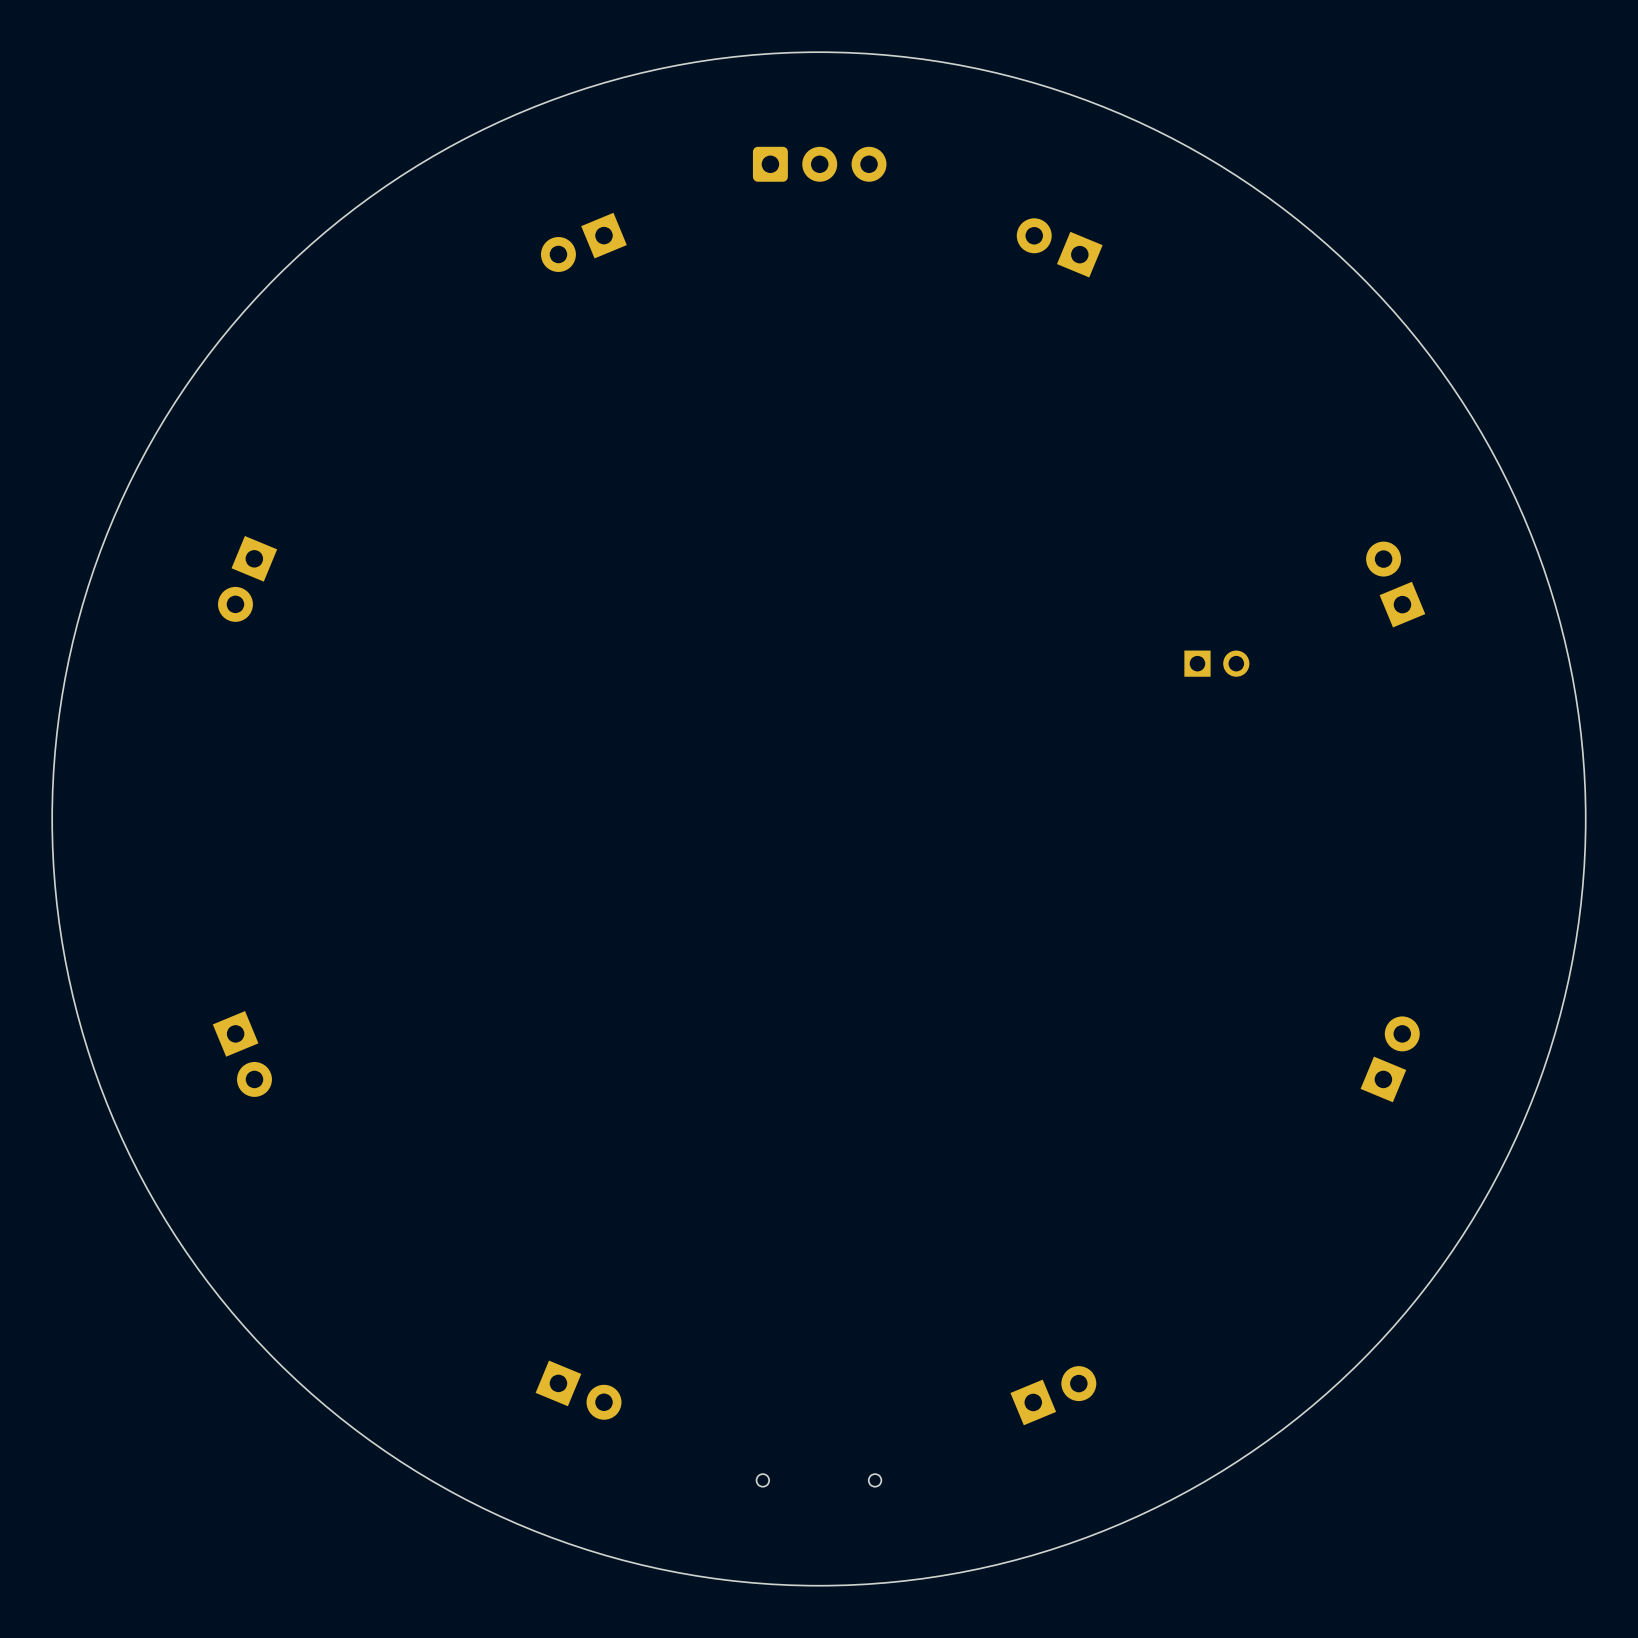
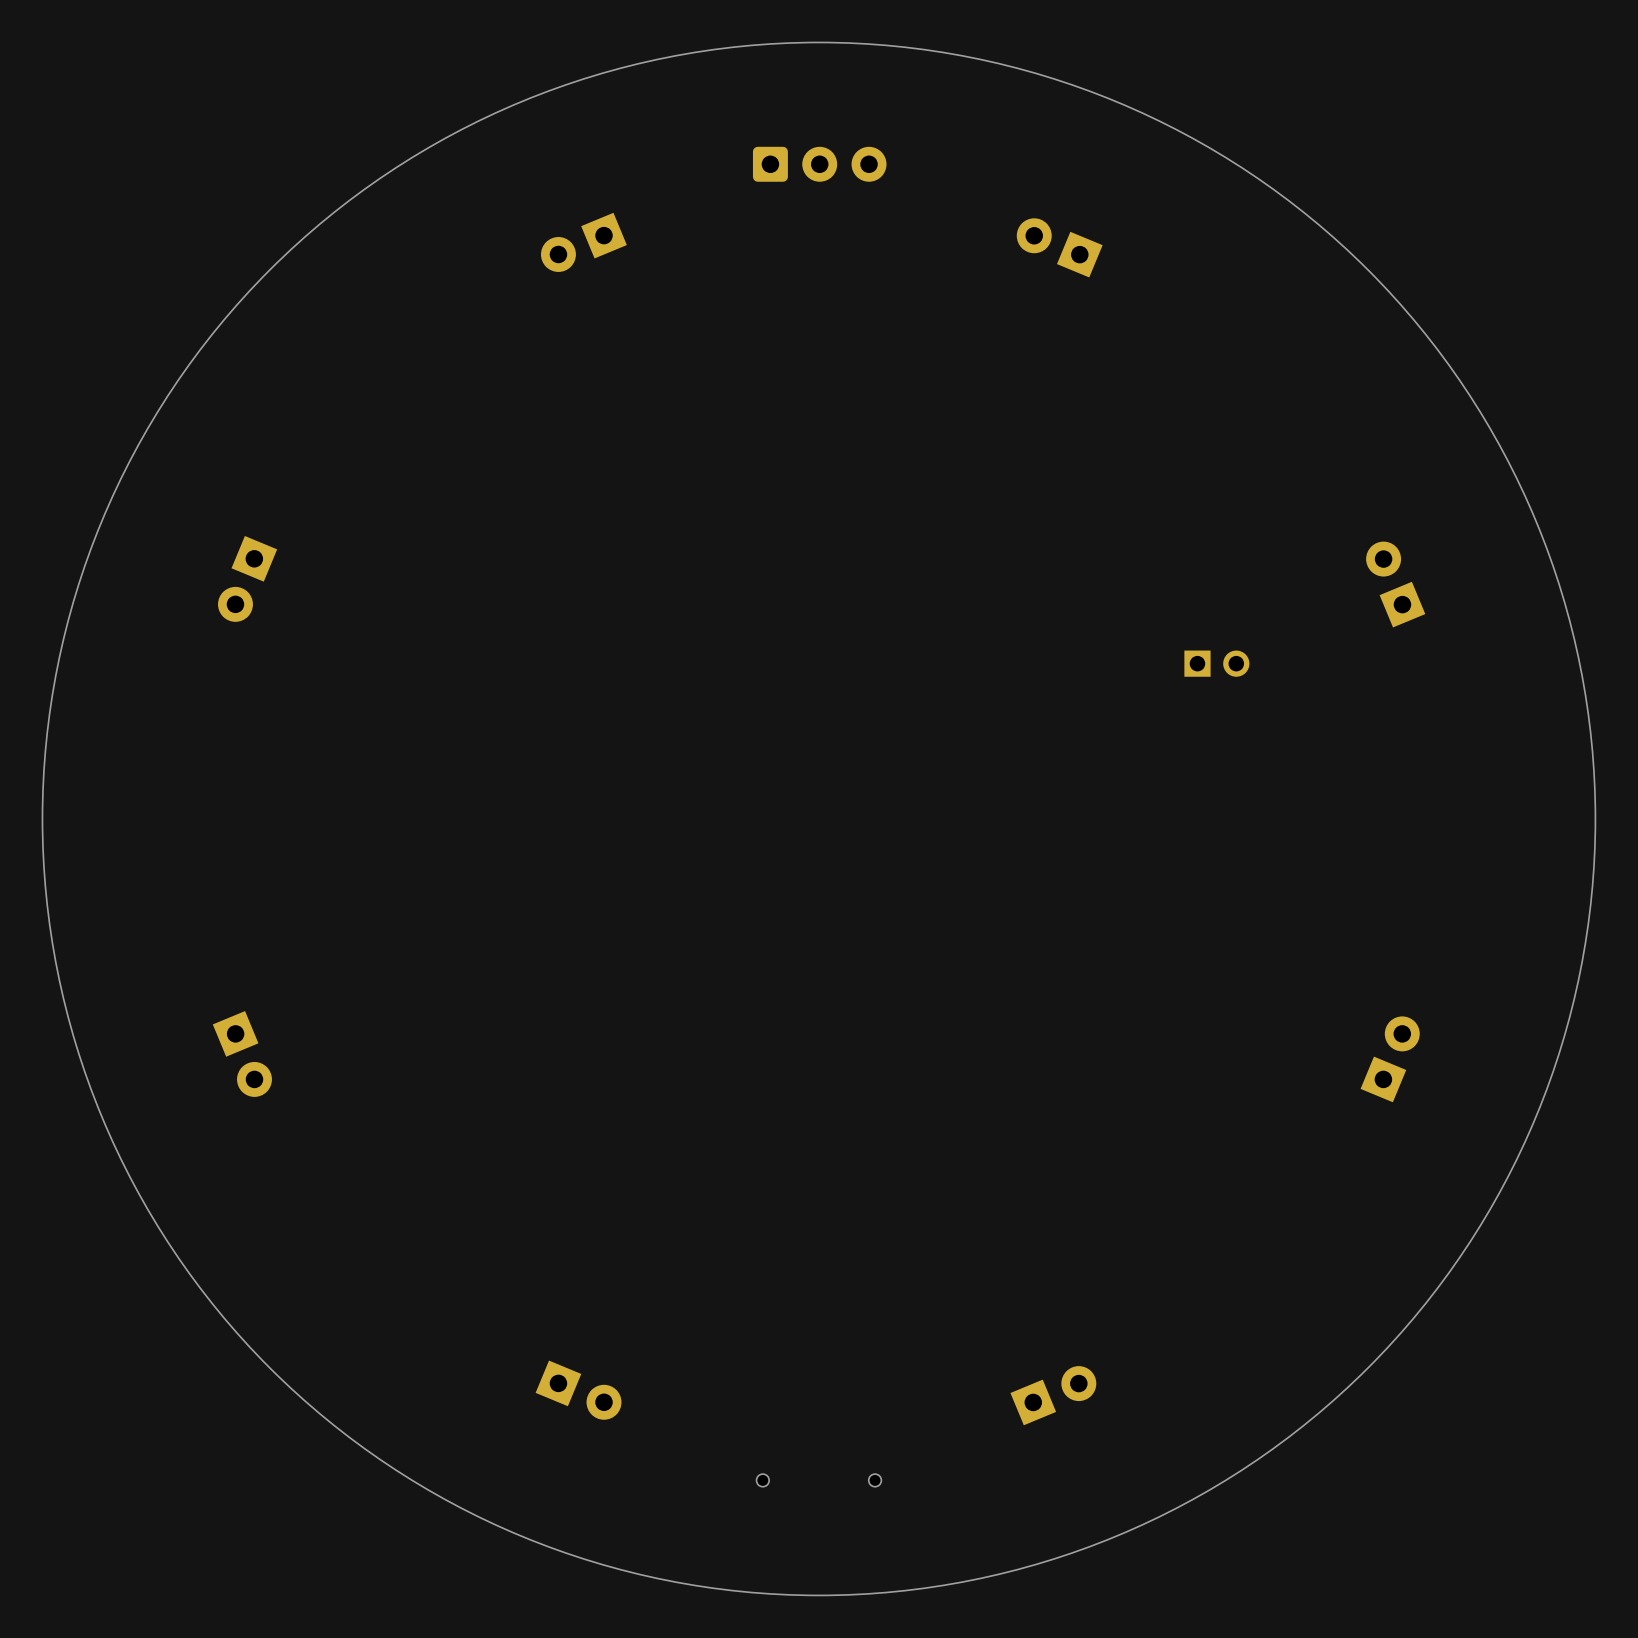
round board edge size: [51, 51, 1587, 1587] -> [41, 41, 1596, 1596]

